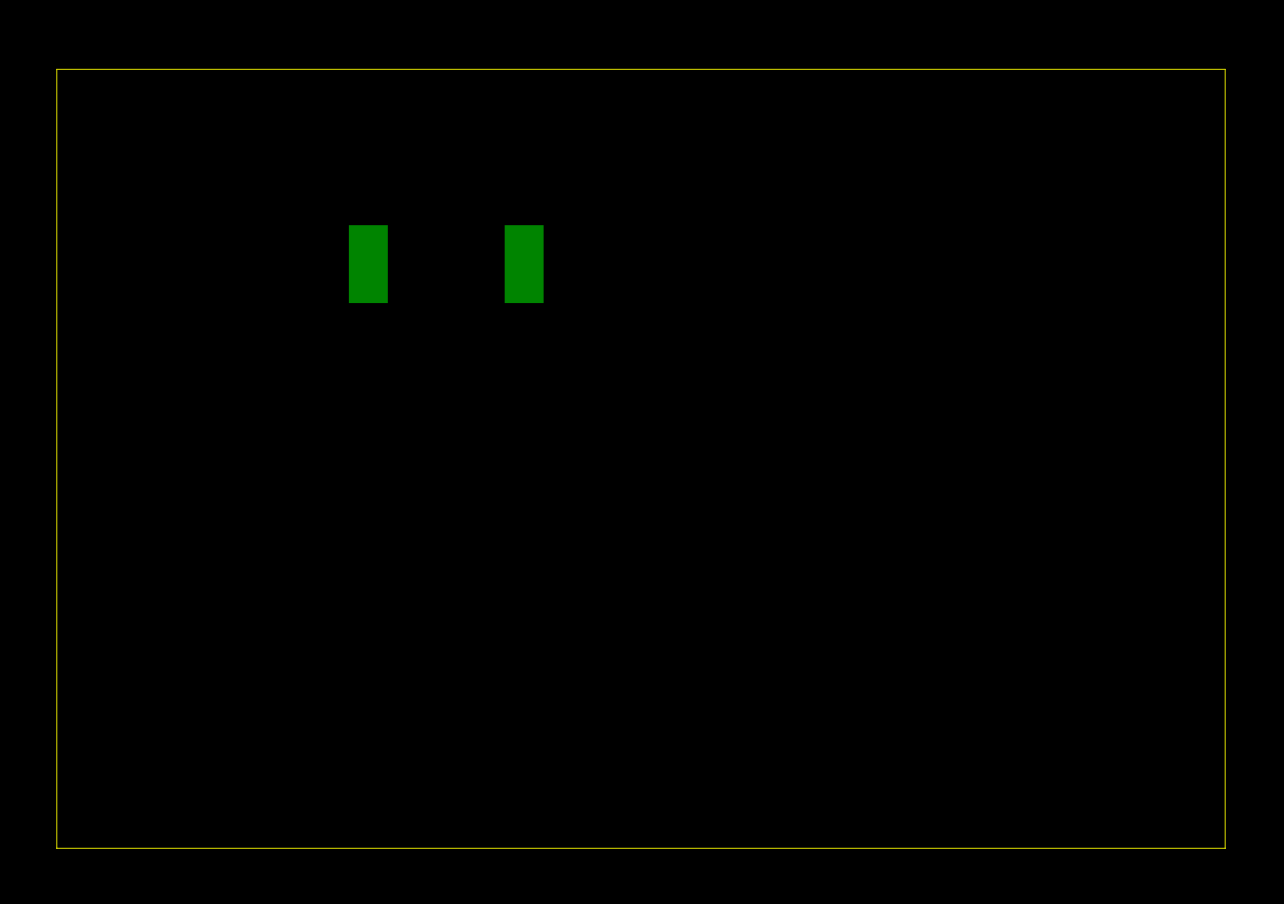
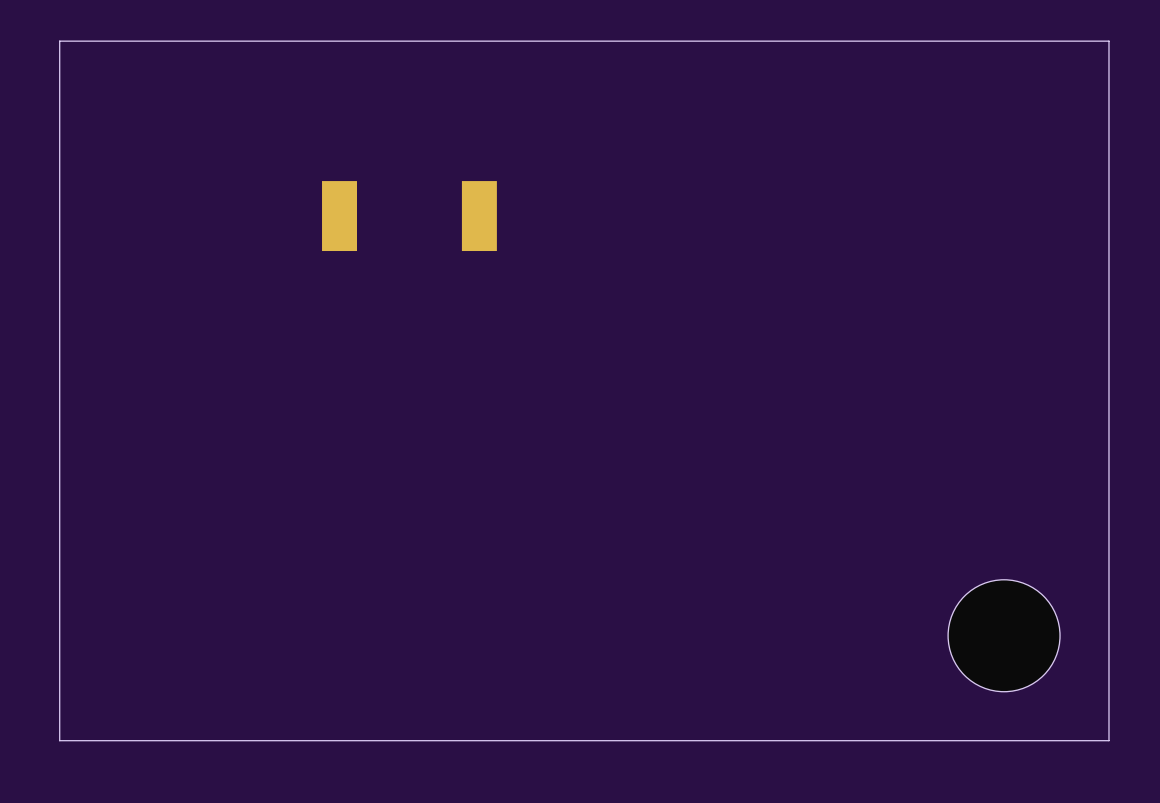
hole: none -> (1004, 635)

